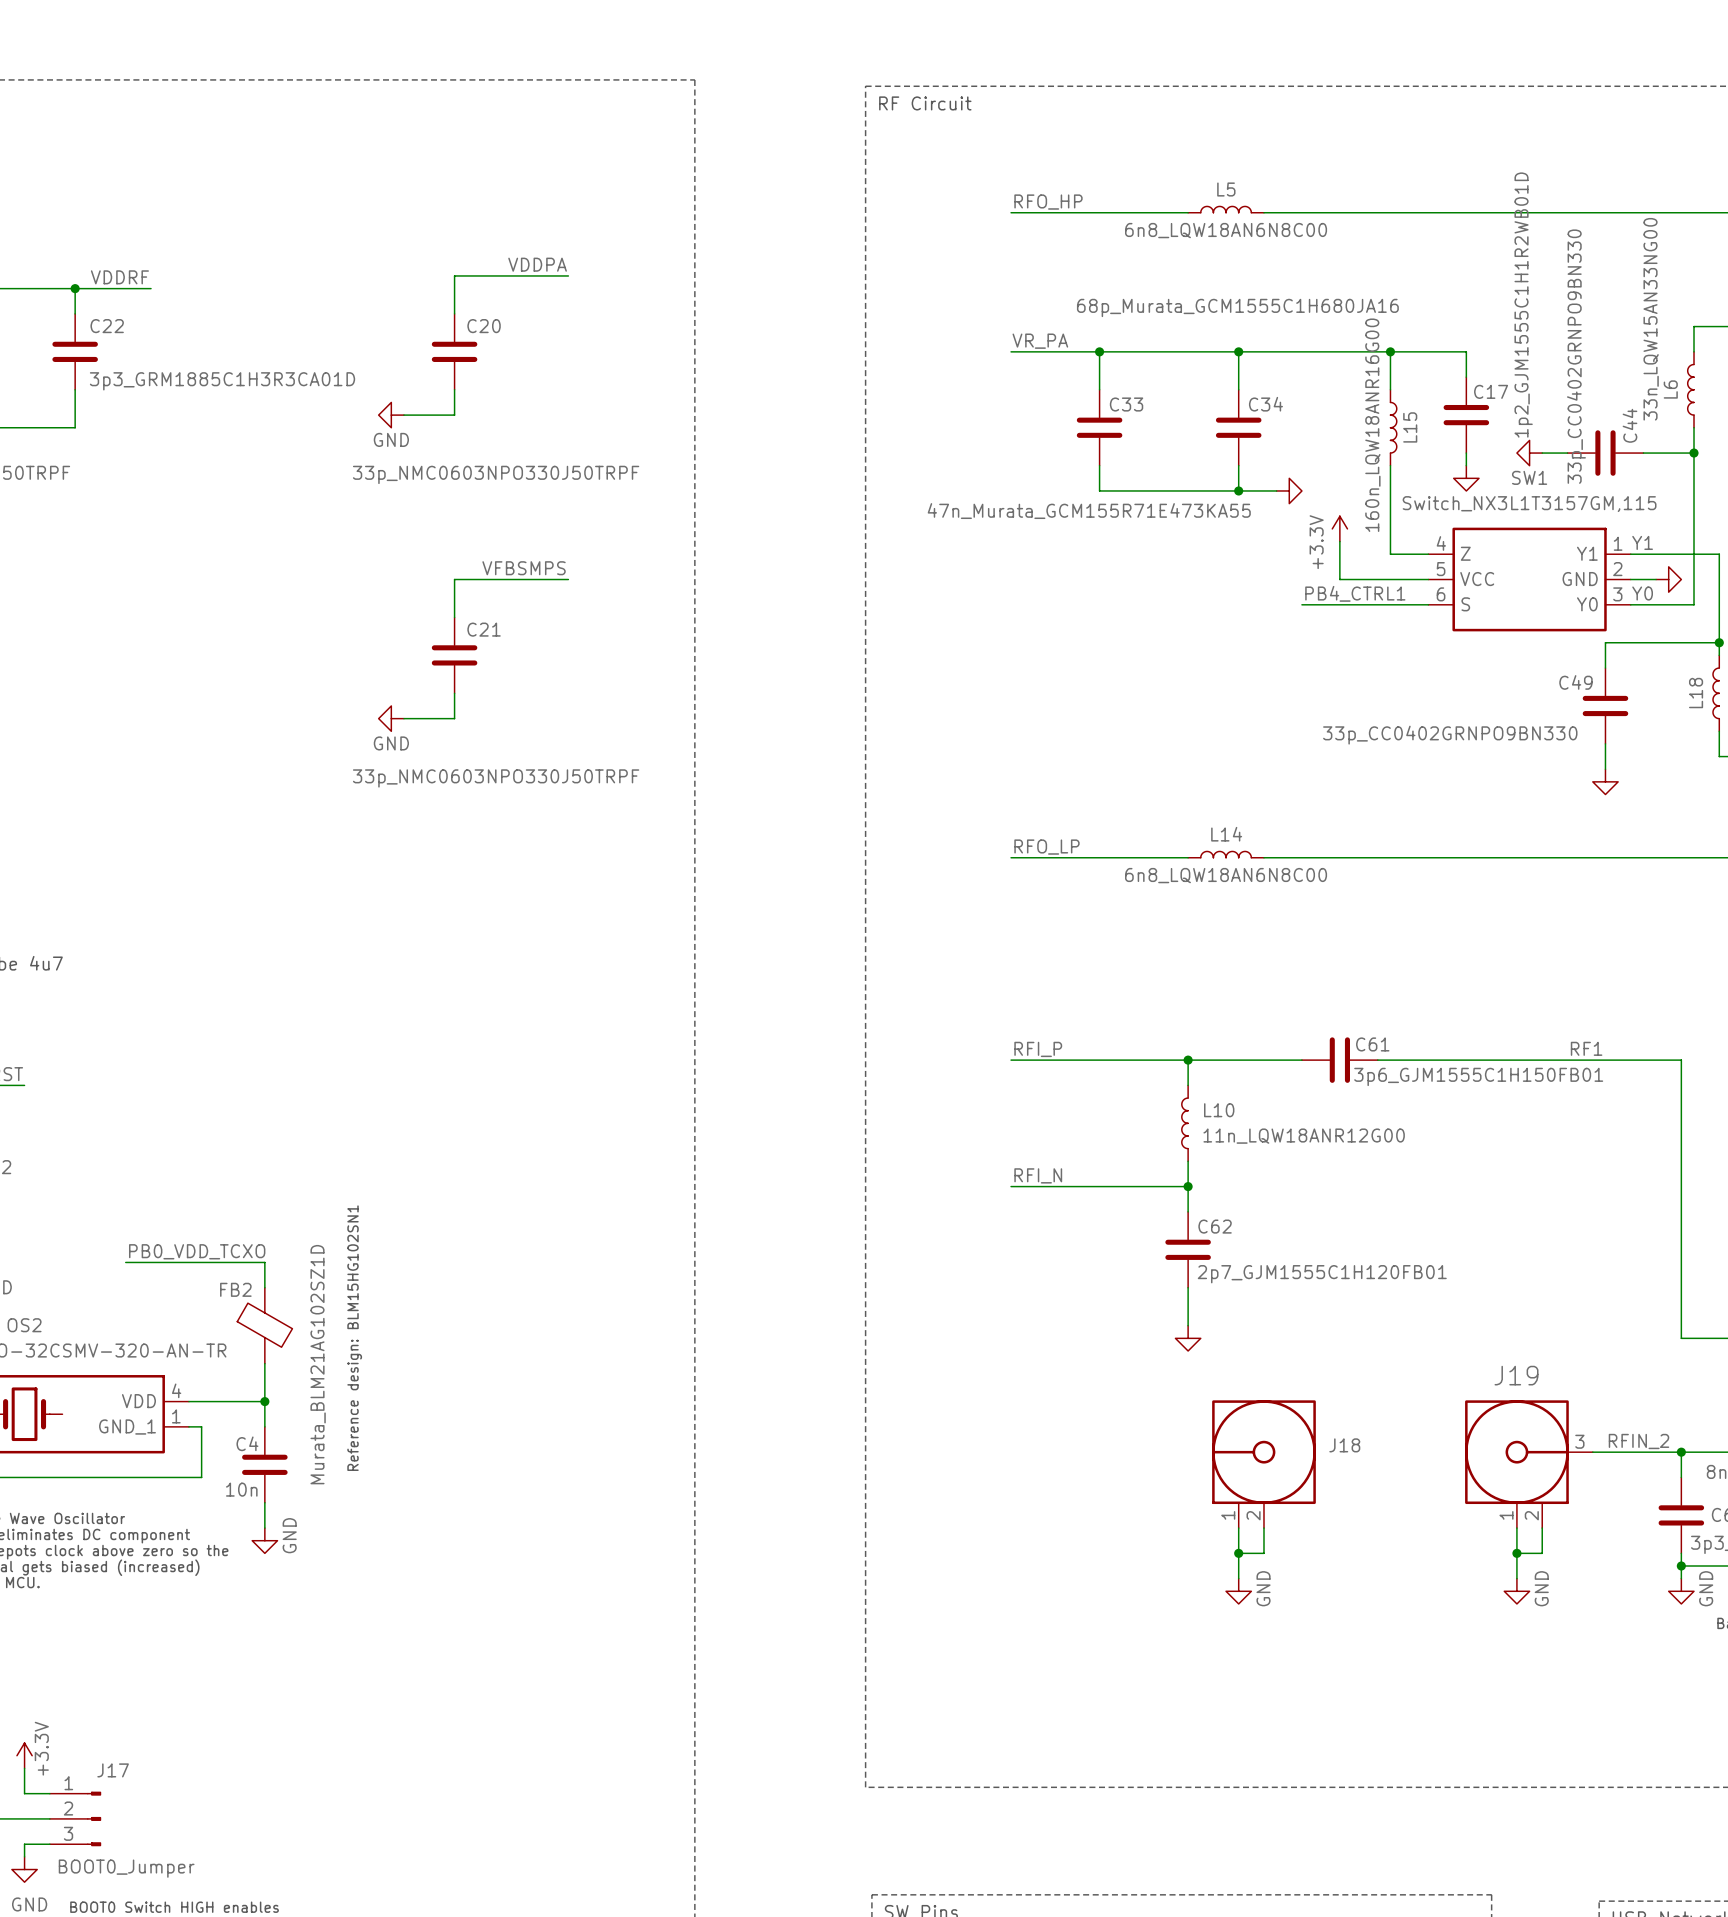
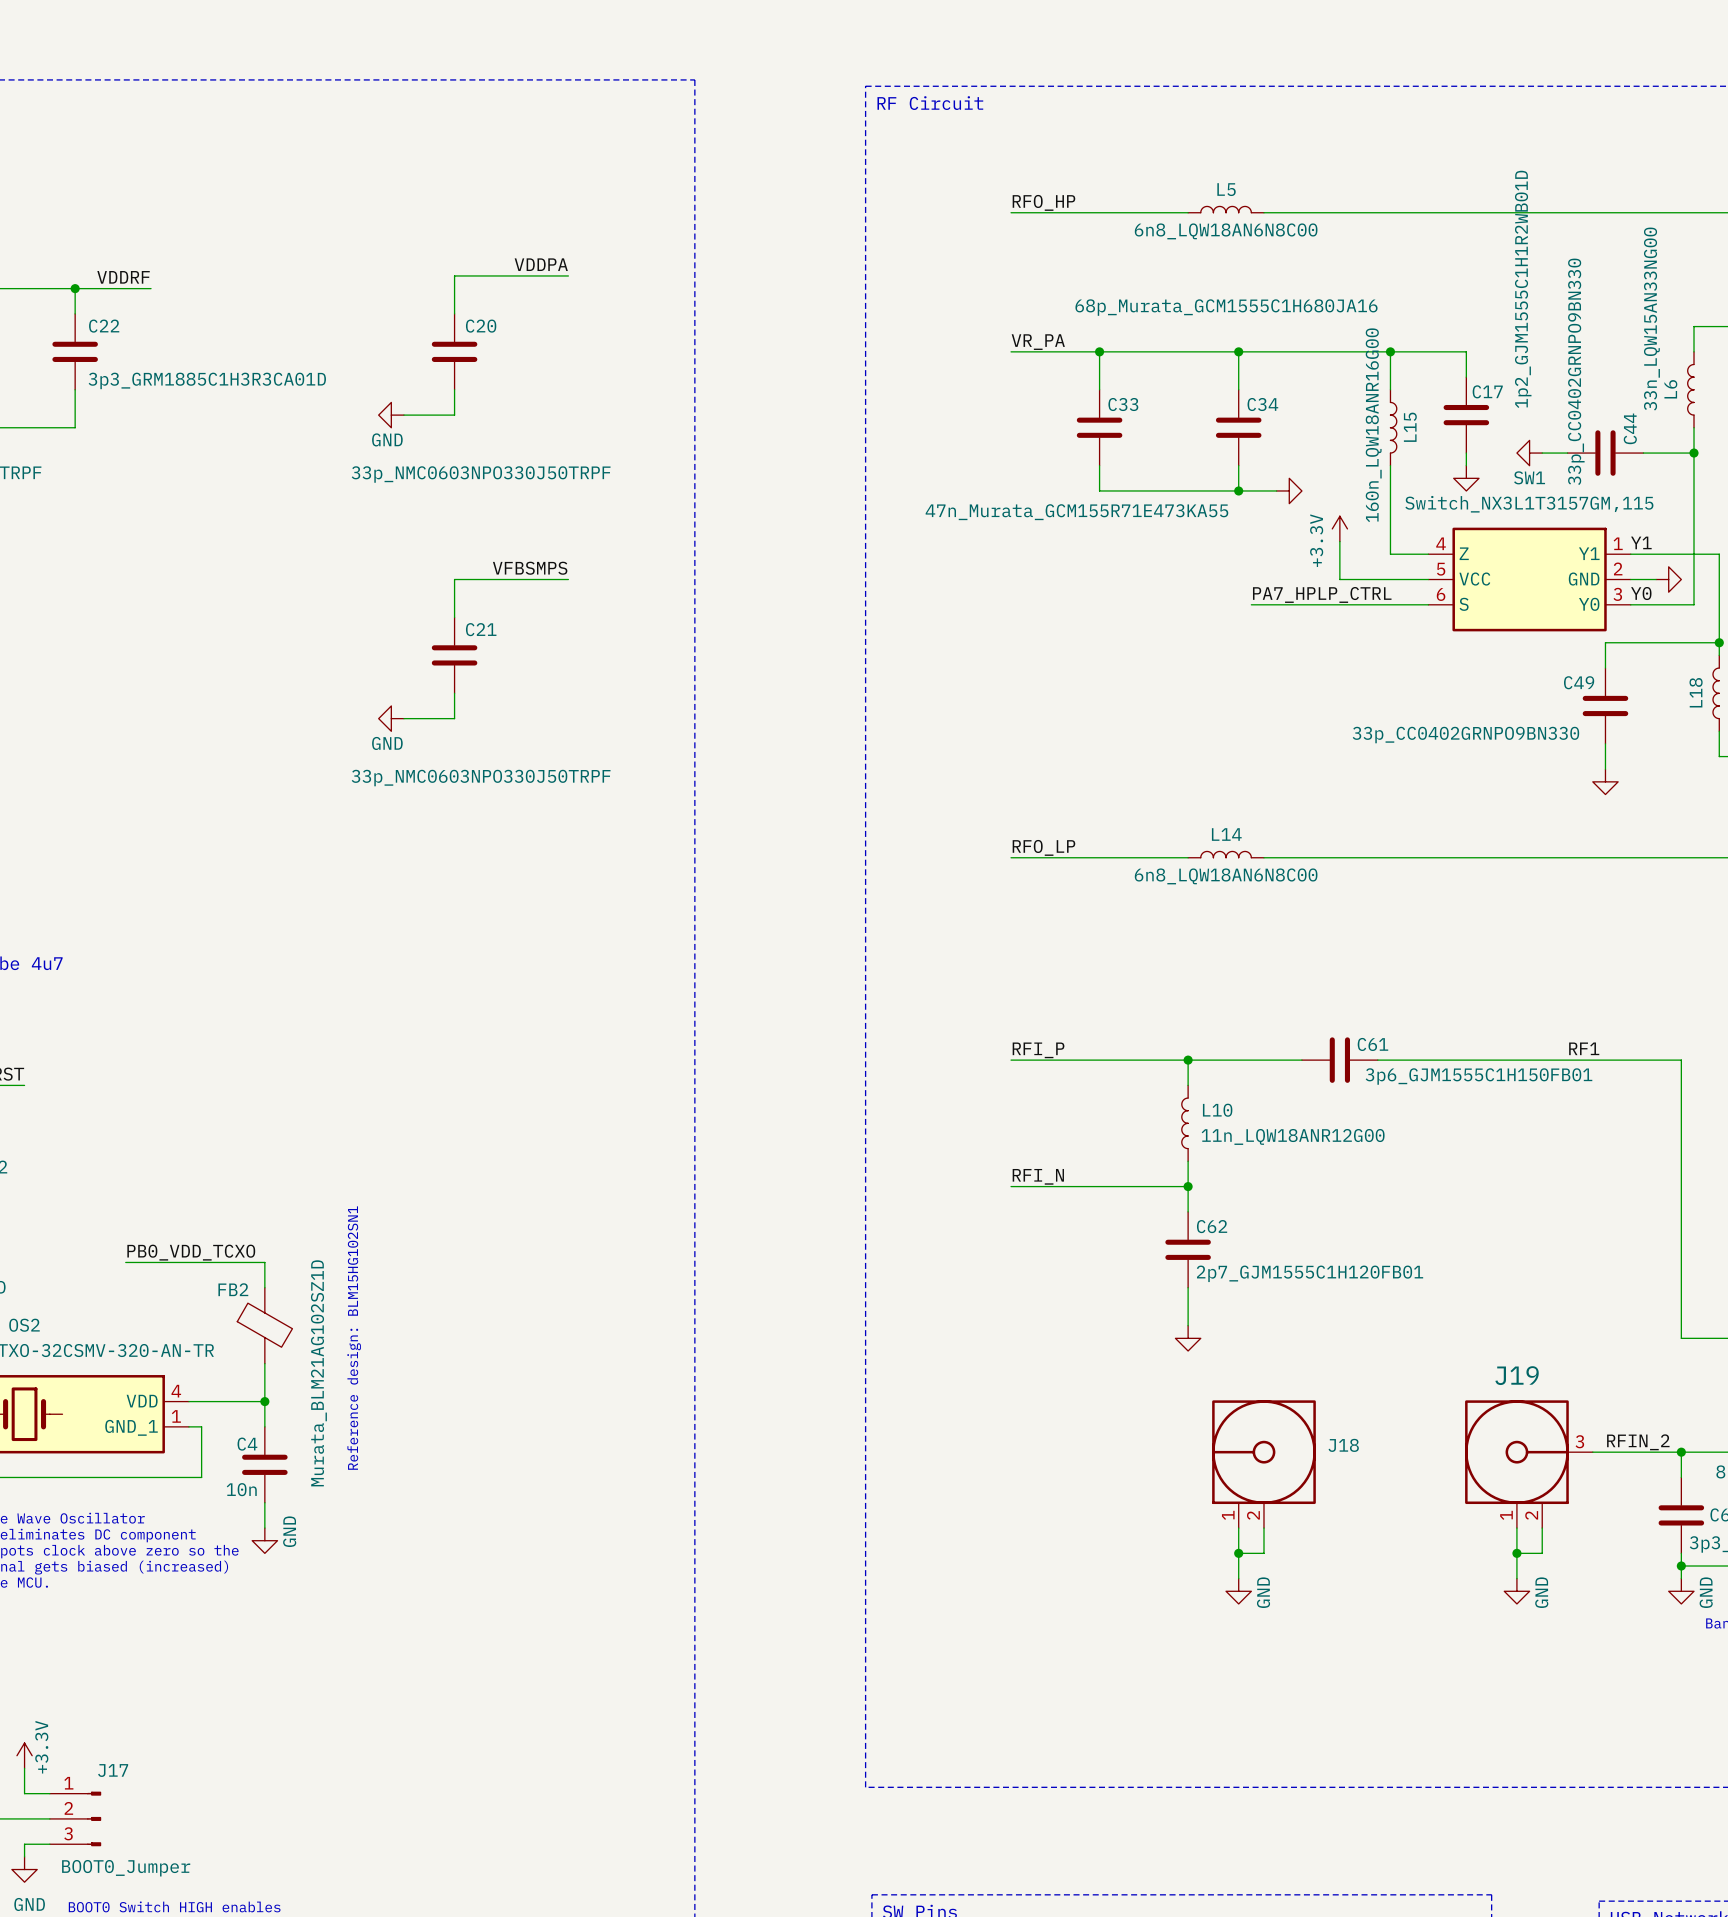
label: PB4_CTRL1 (1355, 593) -> none
label: none -> PA7_HPLP_CTRL (1322, 594)
wire: none -> (1251, 604) (1301, 604)

